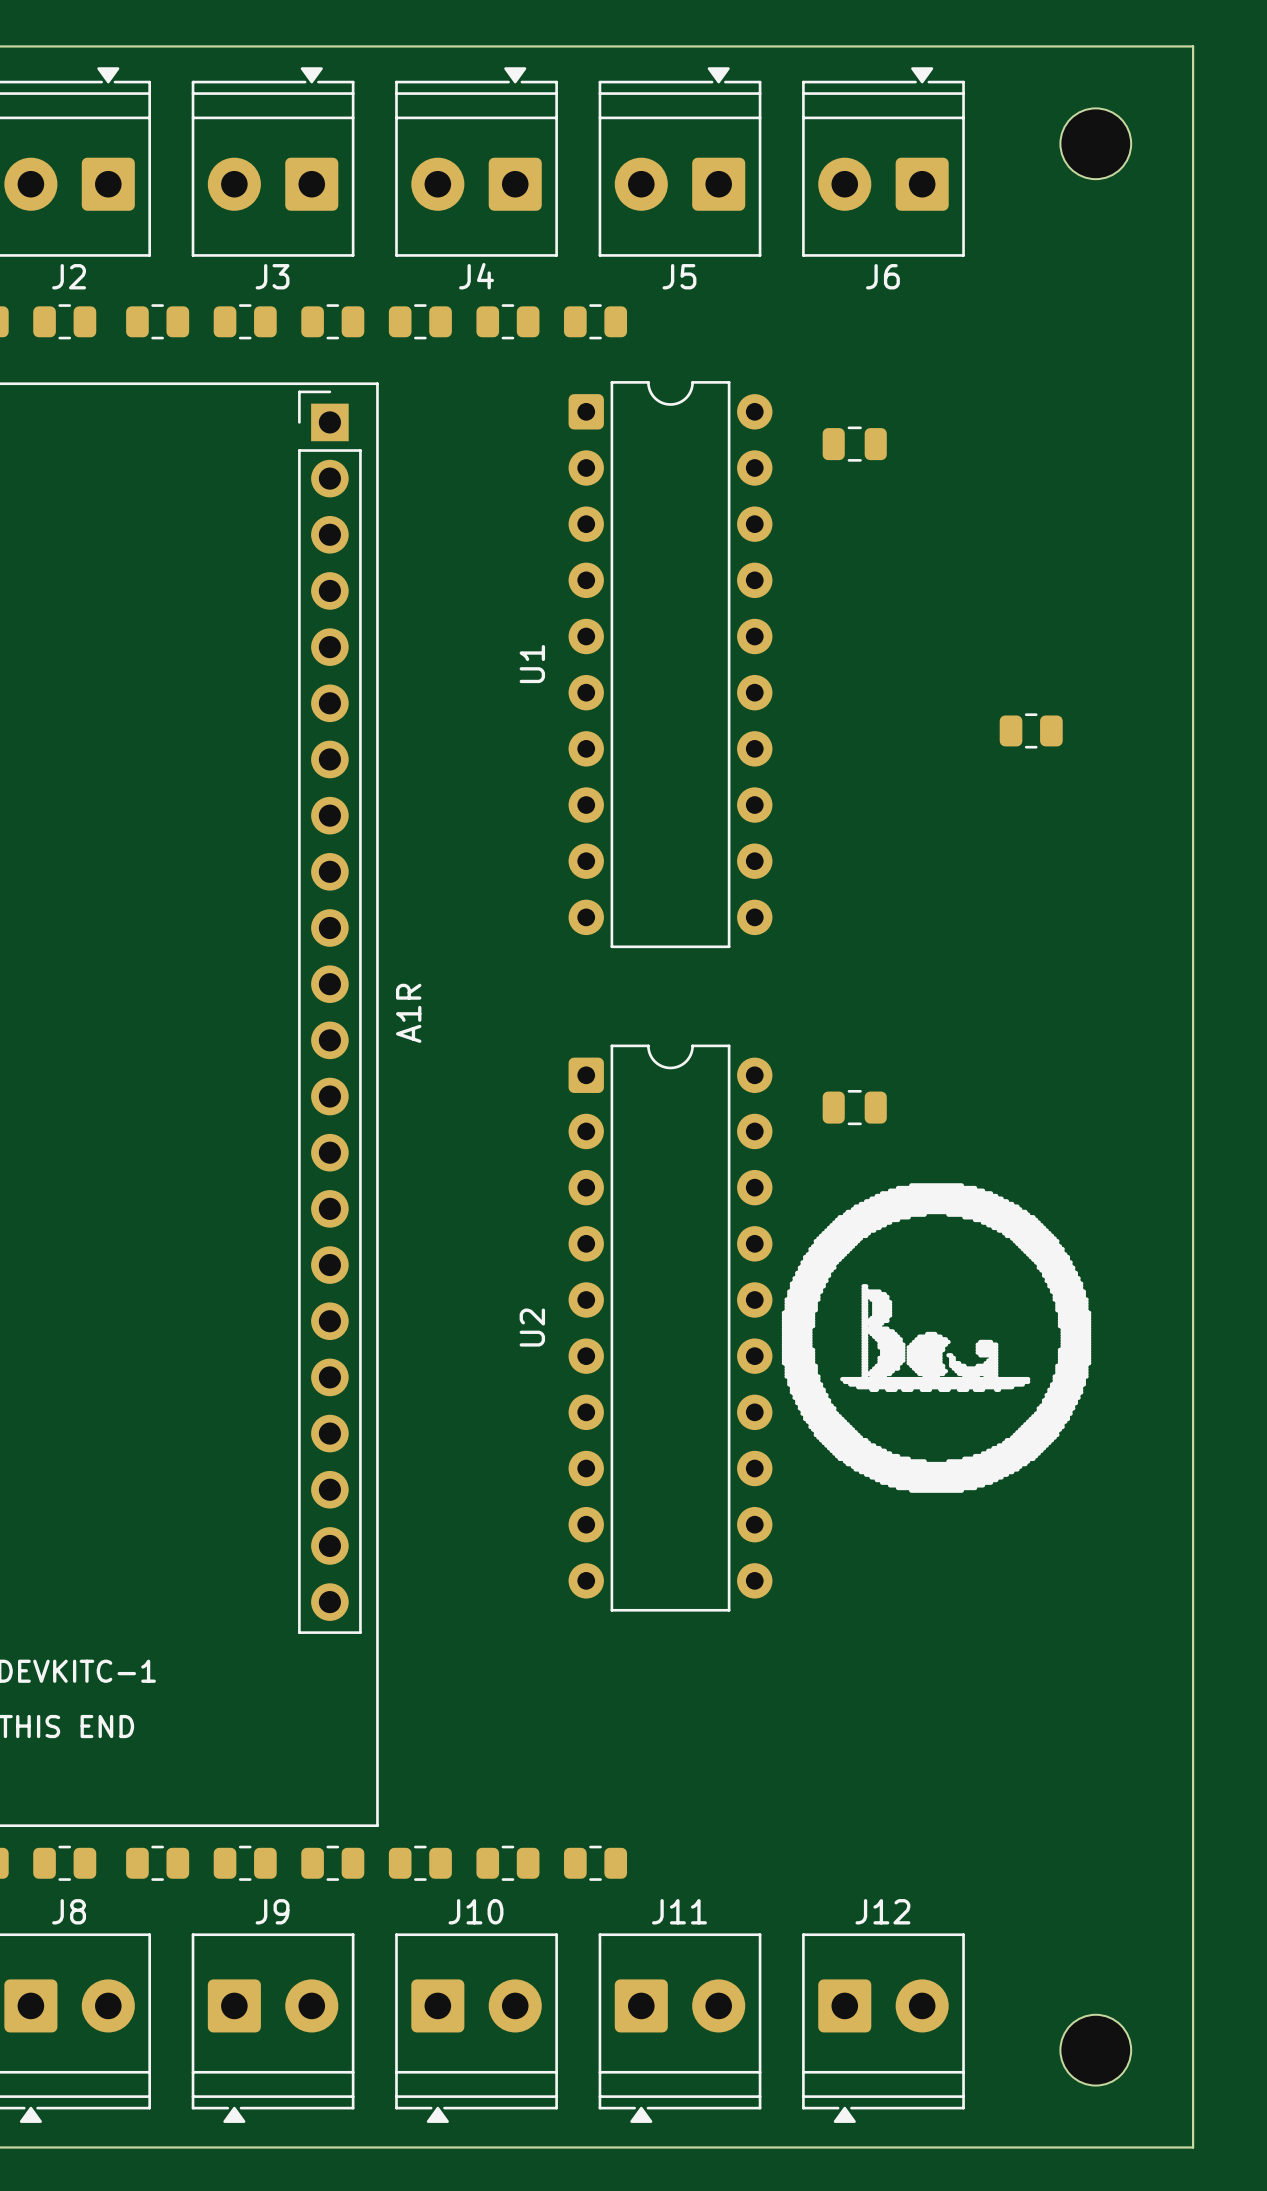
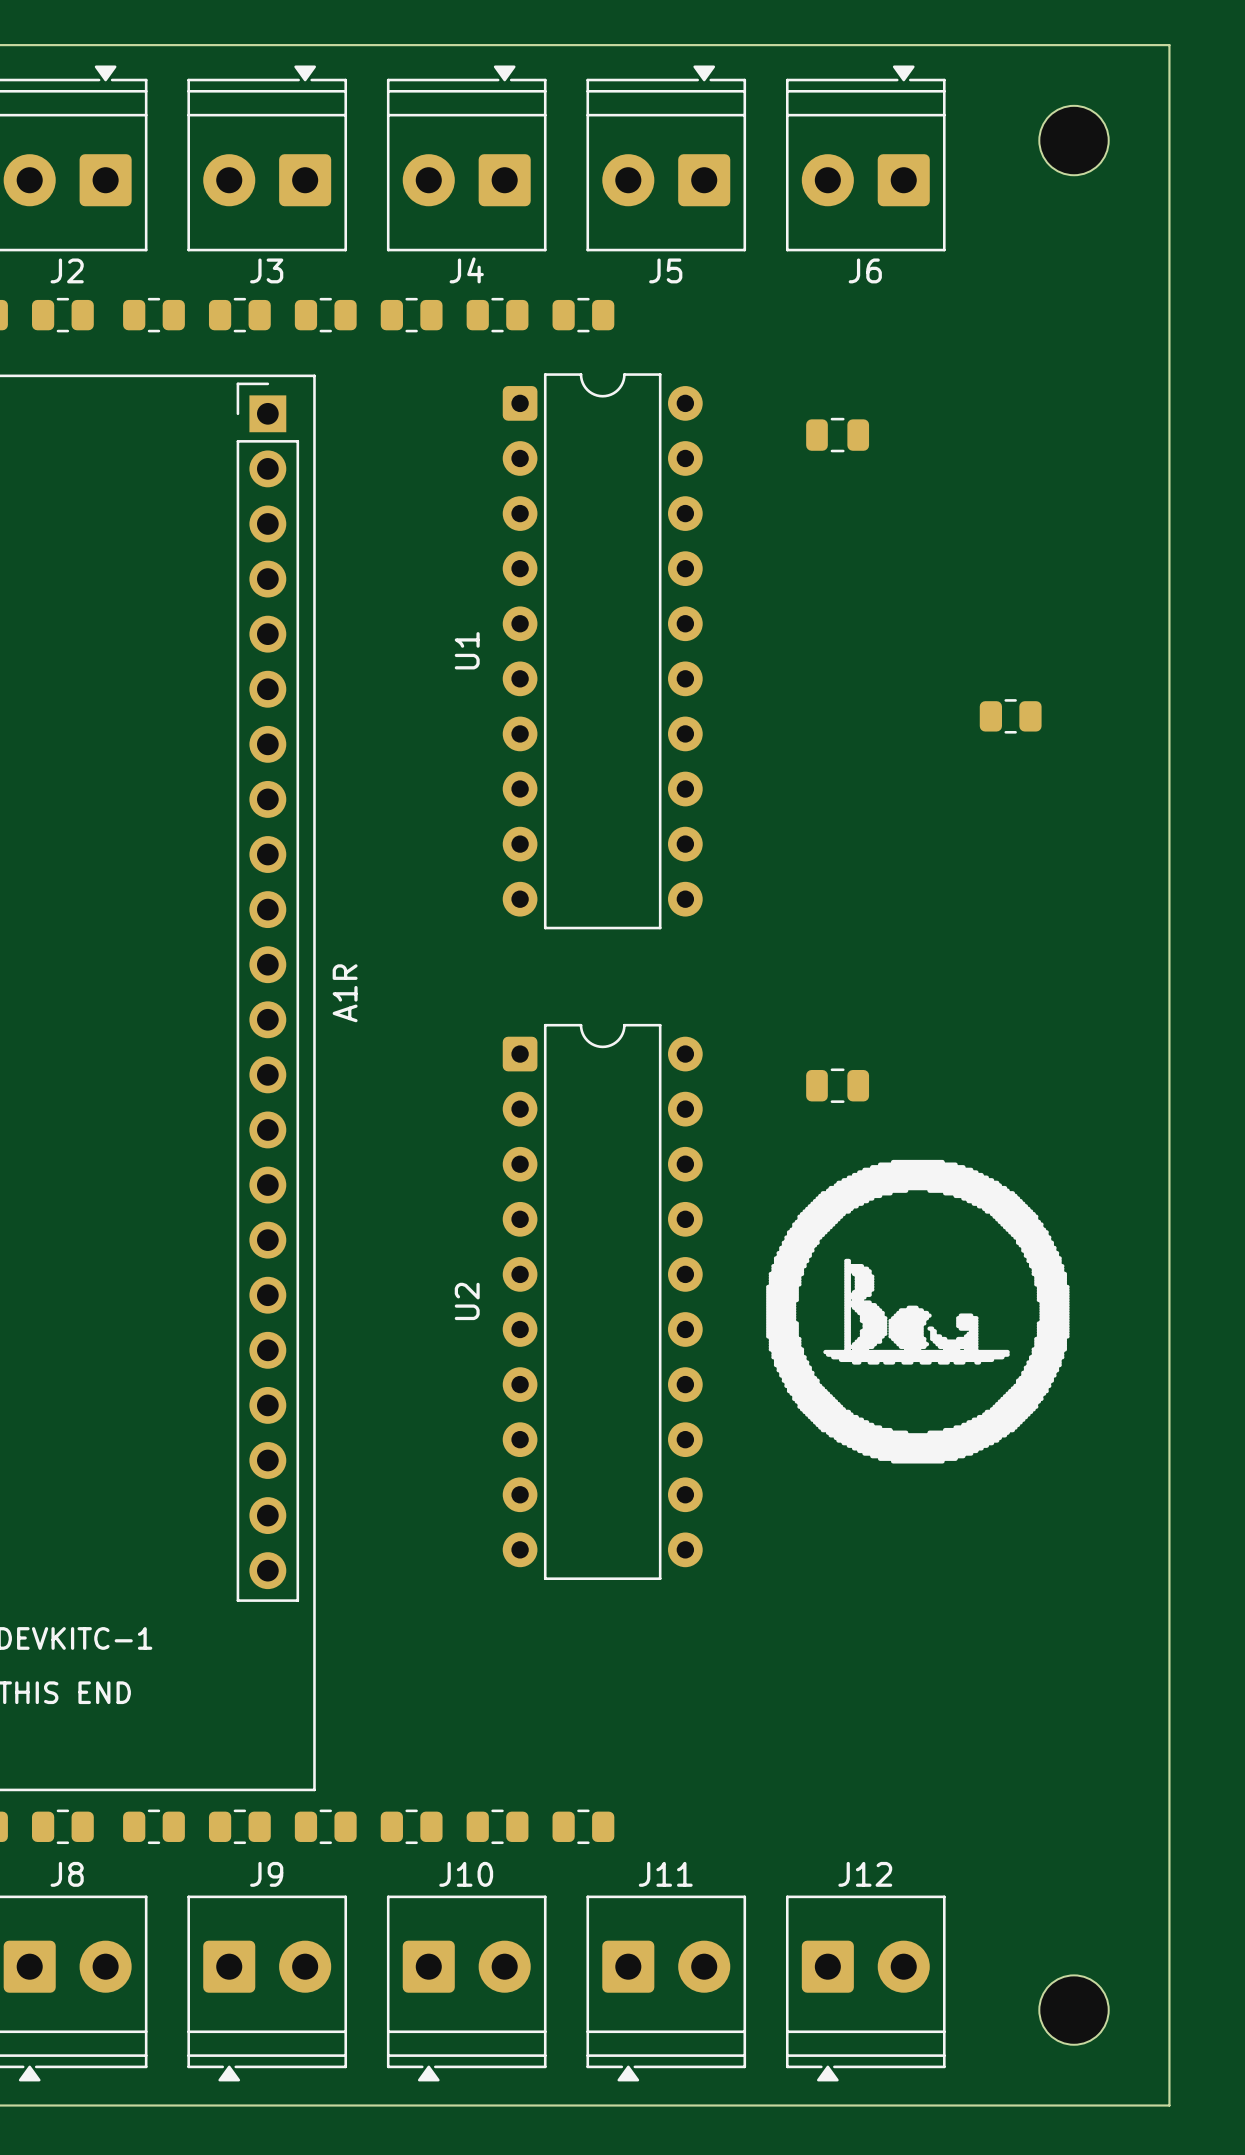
line: (321, 383) (377, 383) (377, 1825) (321, 1825) -> (314, 375) (314, 1789)
U1 position: (670, 664) -> (602, 651)
A1R position: (329, 1012) -> (267, 992)
U2 position: (670, 1328) -> (602, 1301)

